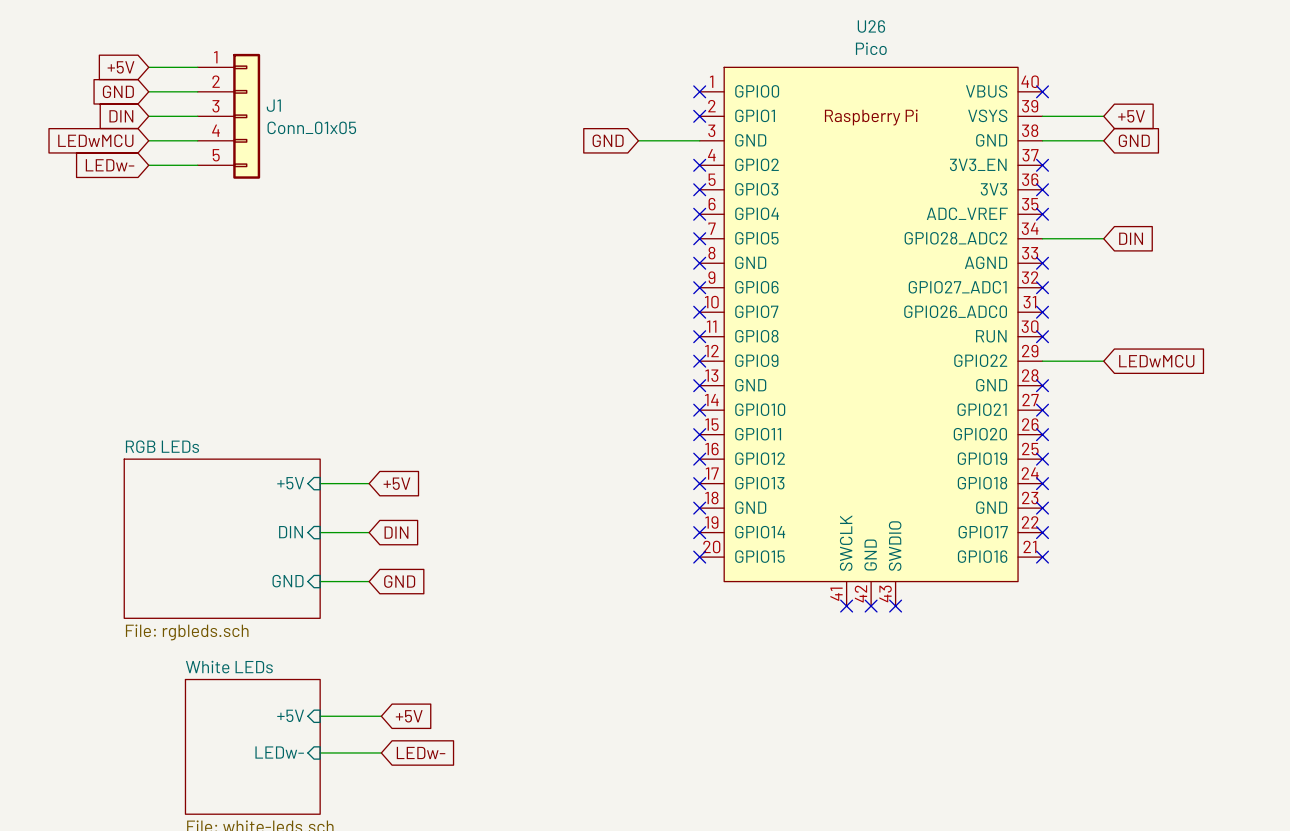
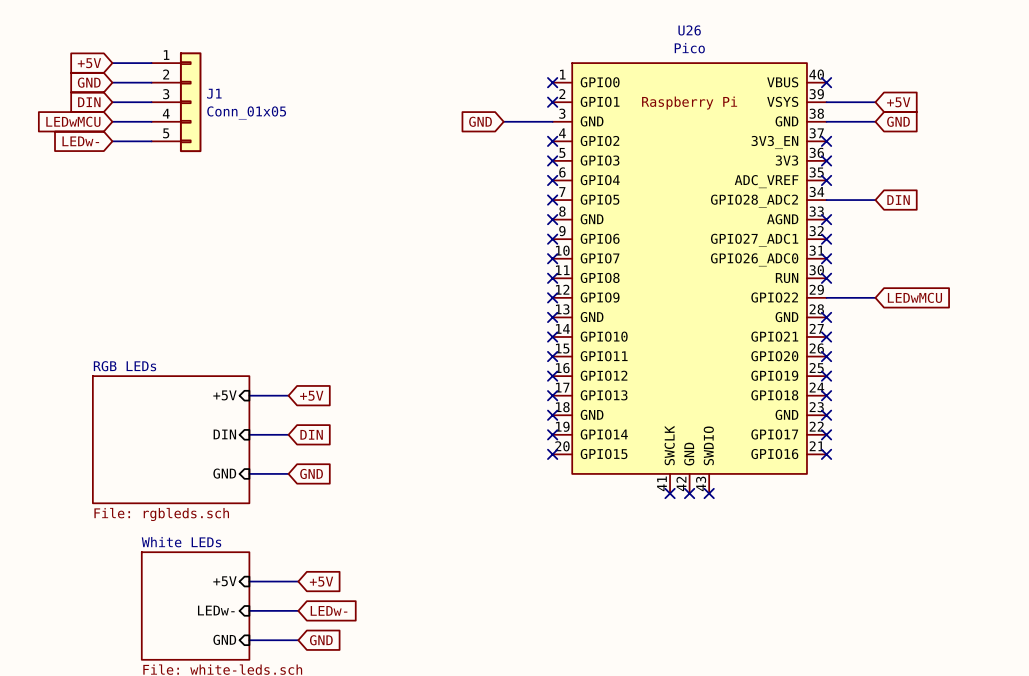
sheet pin: none -> GND (224, 639)
wire: none -> (249, 640) (298, 640)
global label: none -> GND (321, 640)

